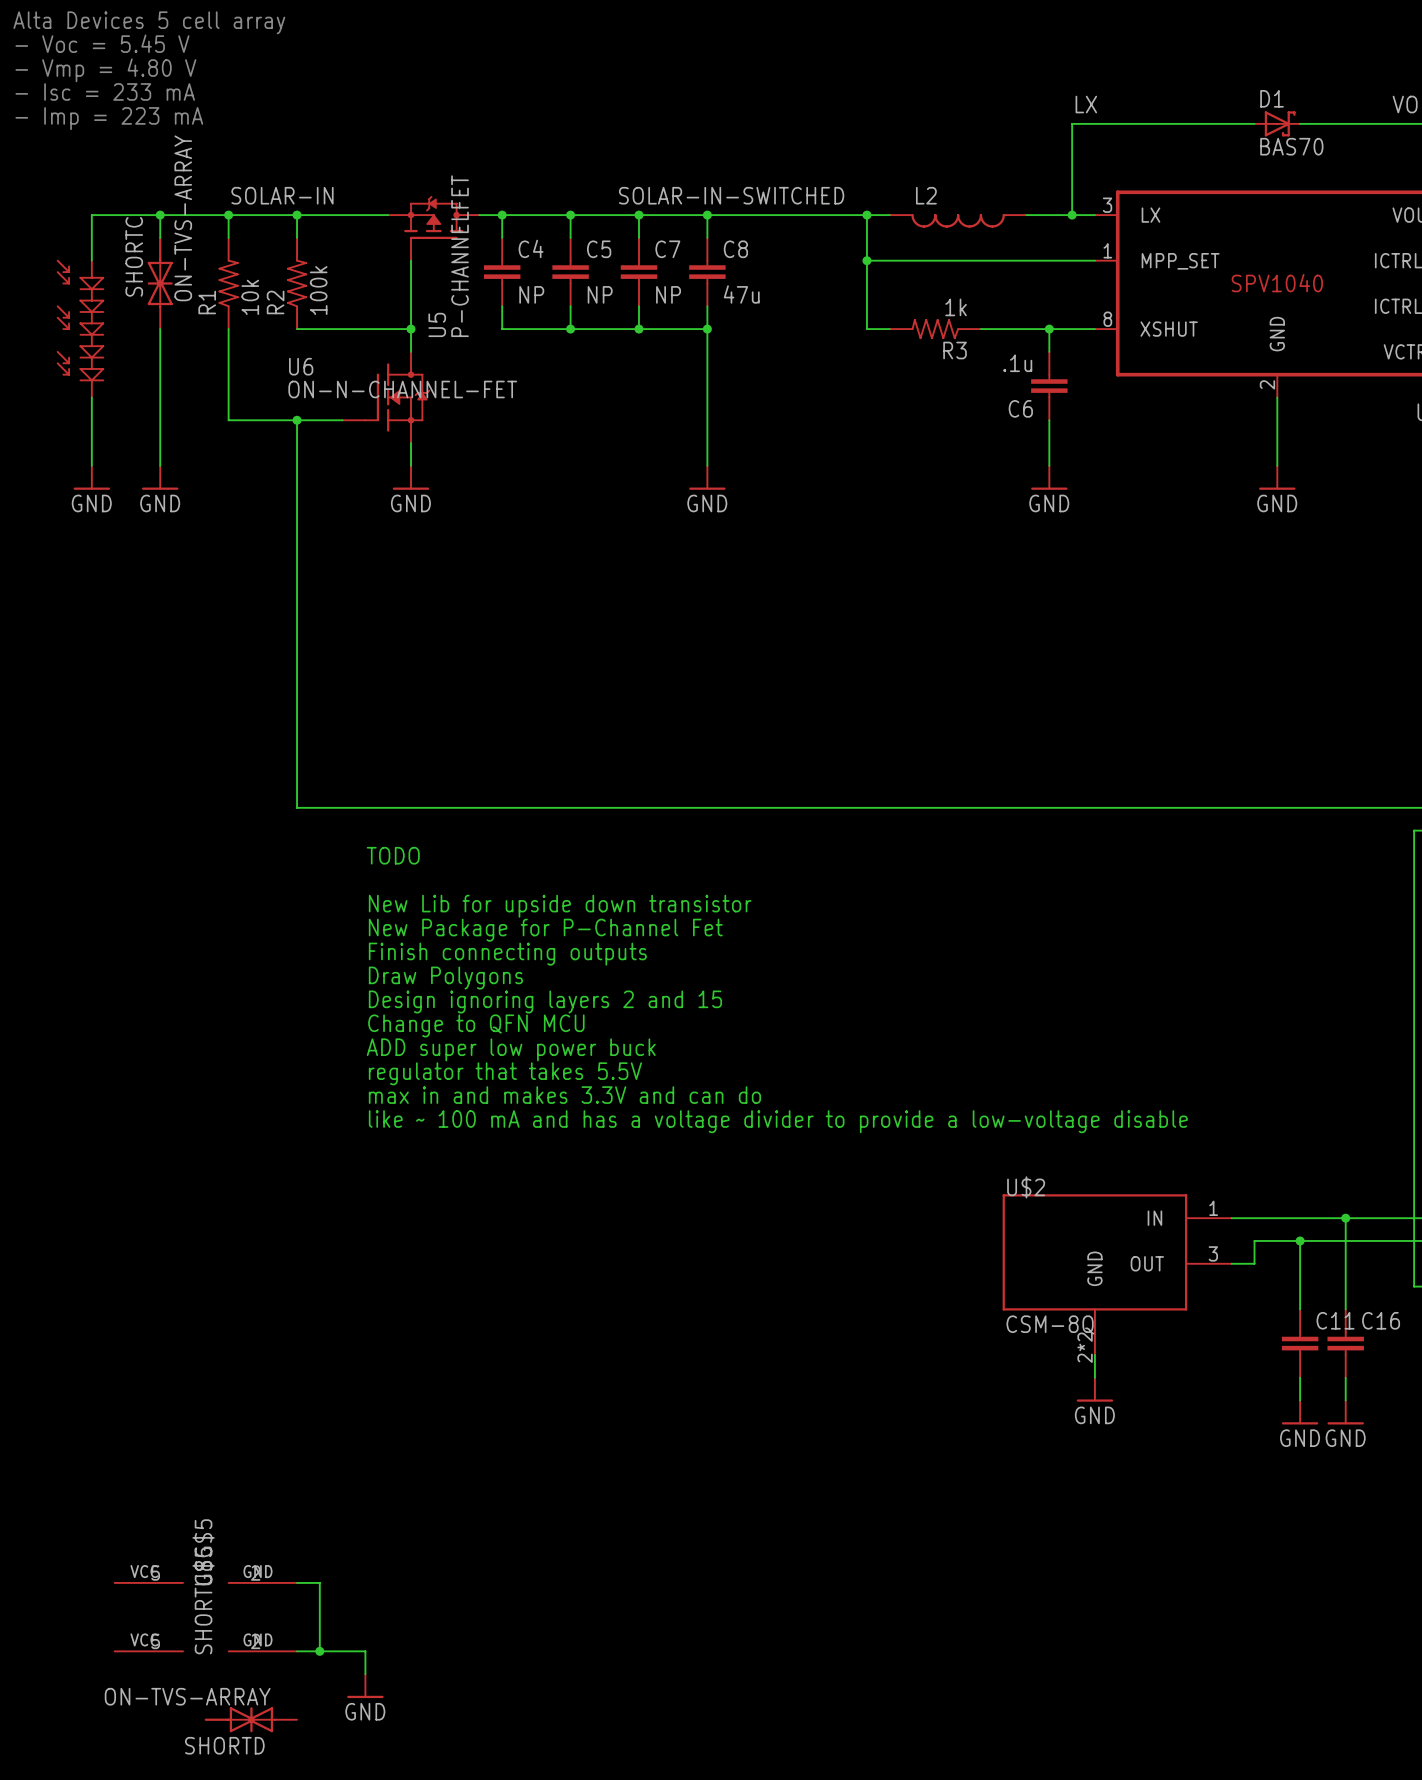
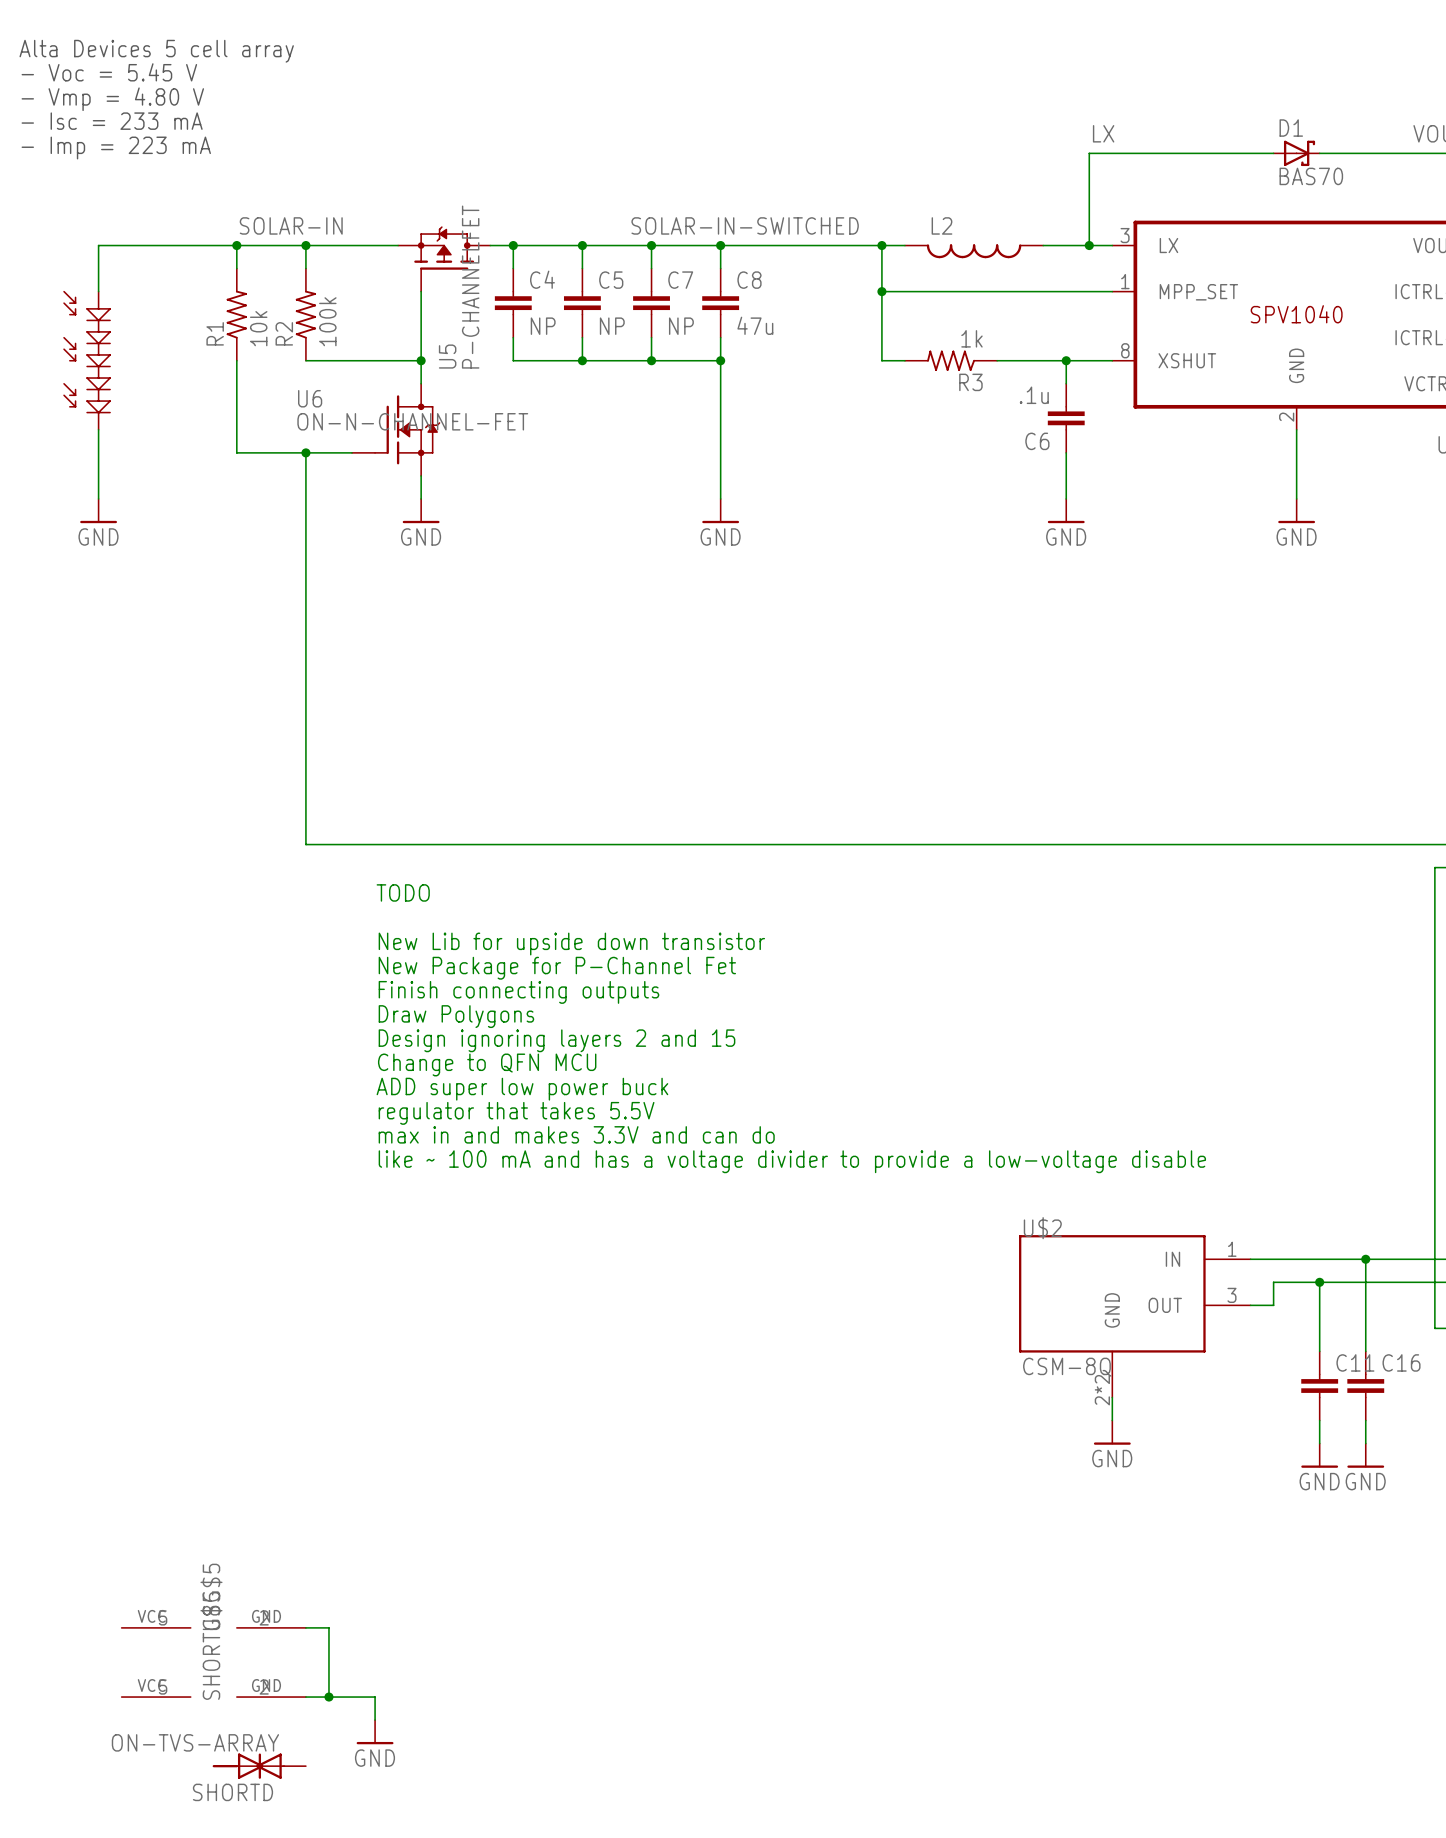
wire: (160, 215) (160, 237) -> none
junction: (160, 215) -> none
SHORTC: ON-TVS-ARRAY (160, 282) -> none
wire: (160, 329) (160, 465) -> none
power symbol: GND (160, 477) -> none

